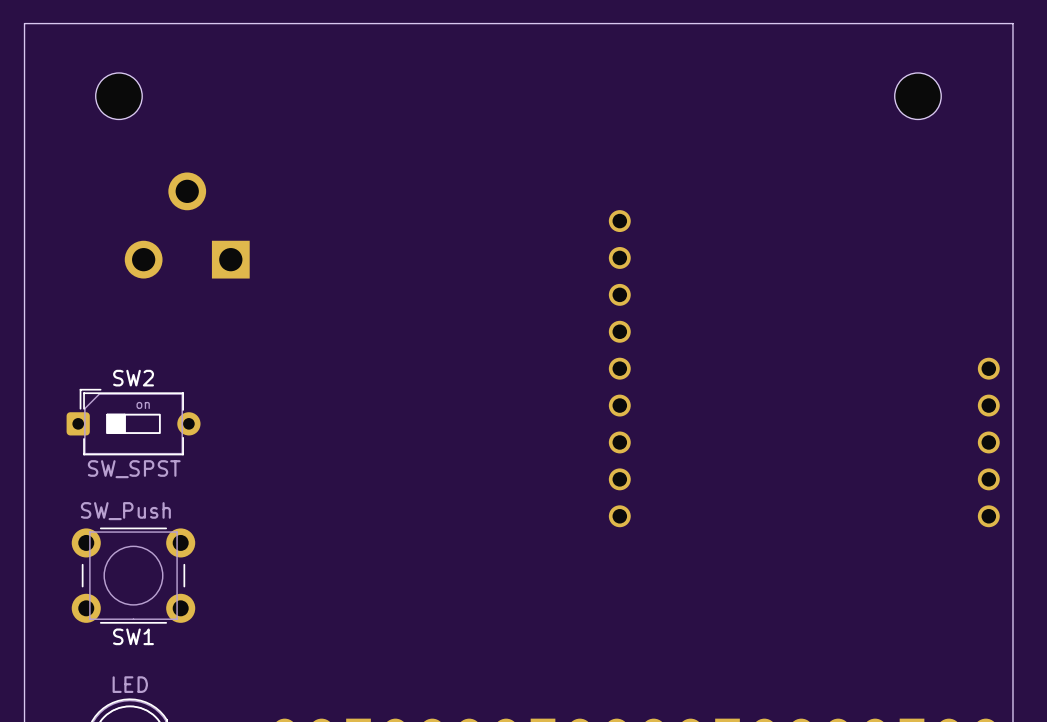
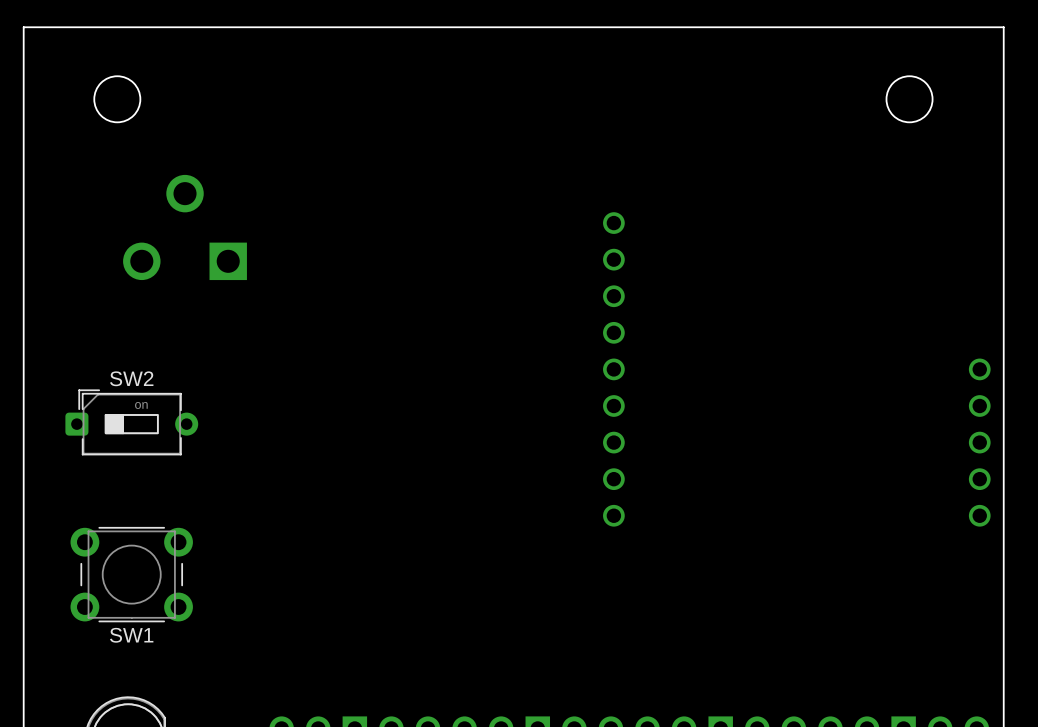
SW2 value: SW_SPST (134, 469) -> none
SW1 value: SW_Push (125, 511) -> none
part value: LED (130, 684) -> none

